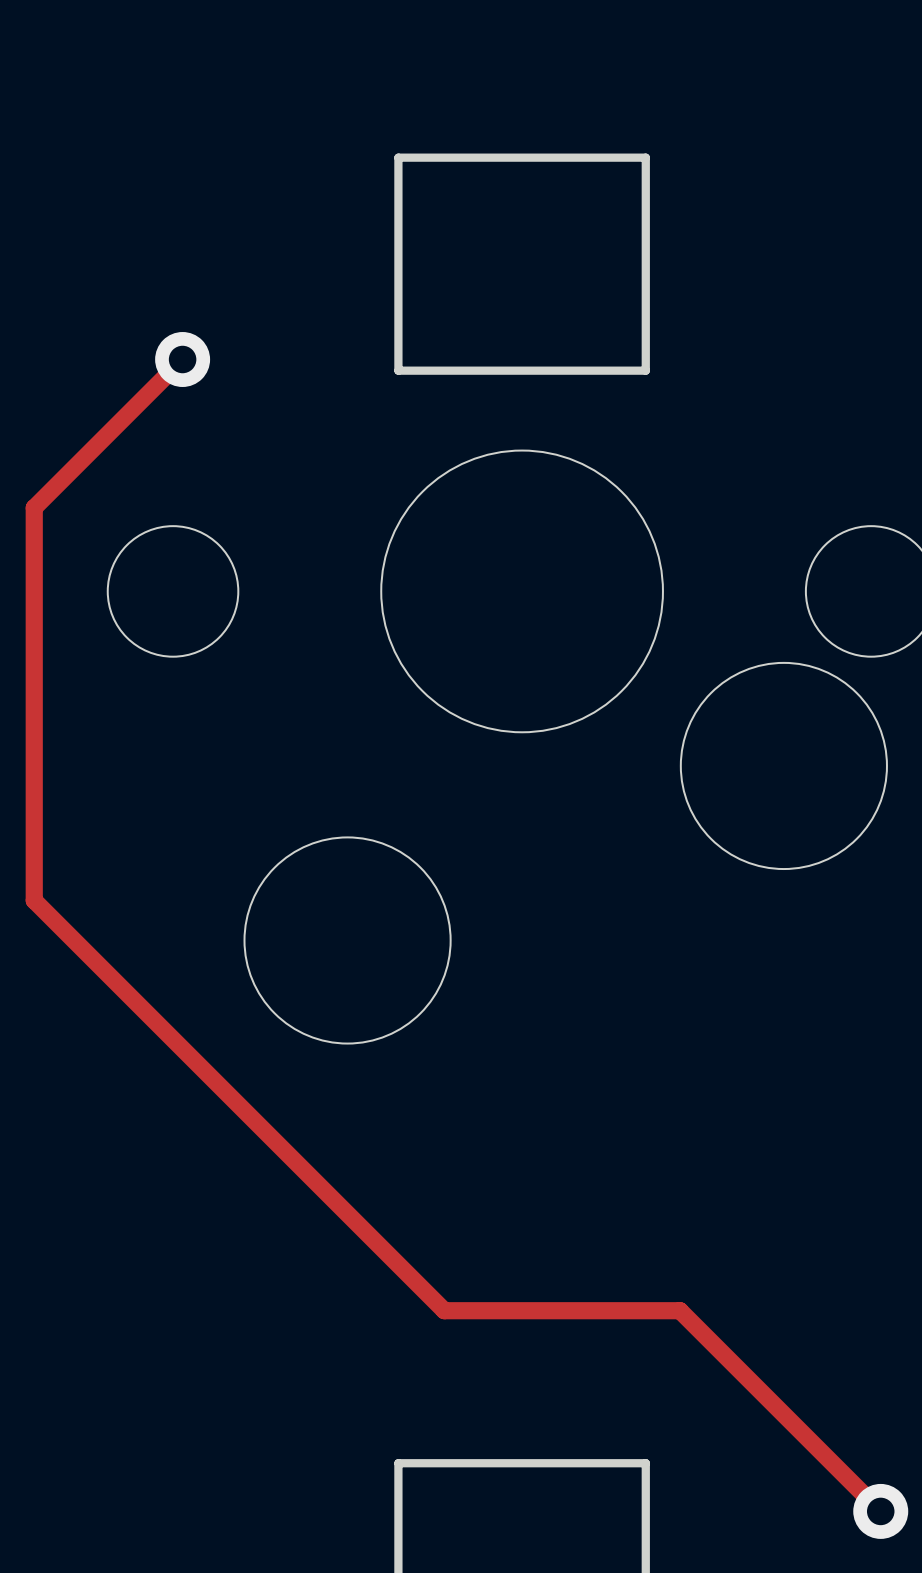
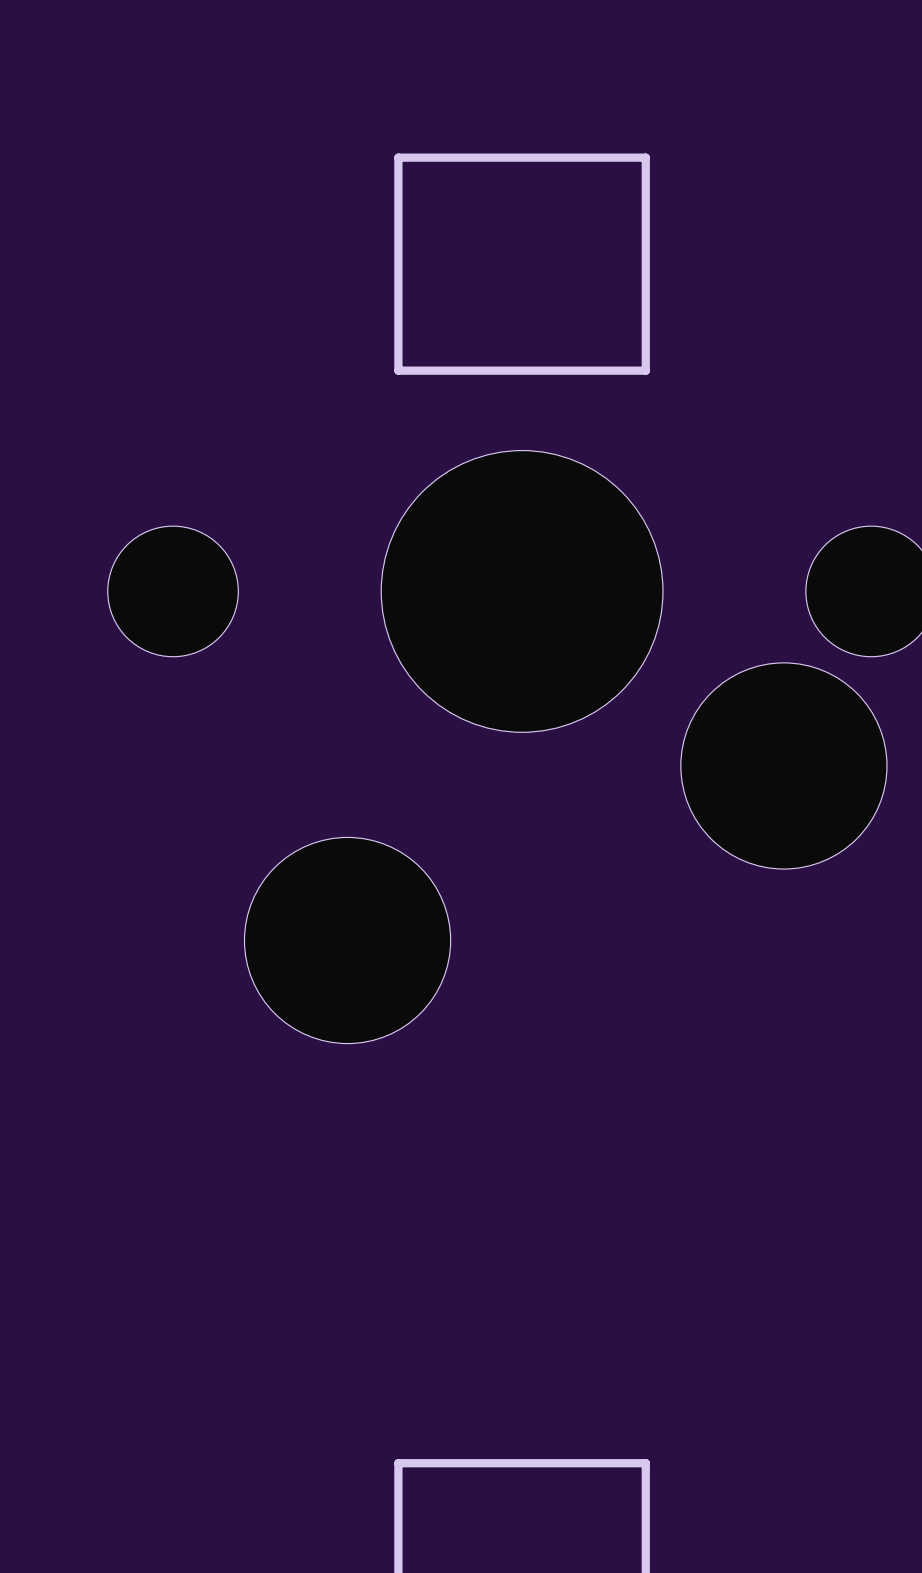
track: (182, 359) (34, 507) (34, 900) (444, 1310) (680, 1310) (880, 1511) -> none
via: (182, 359) -> none
via: (880, 1511) -> none

